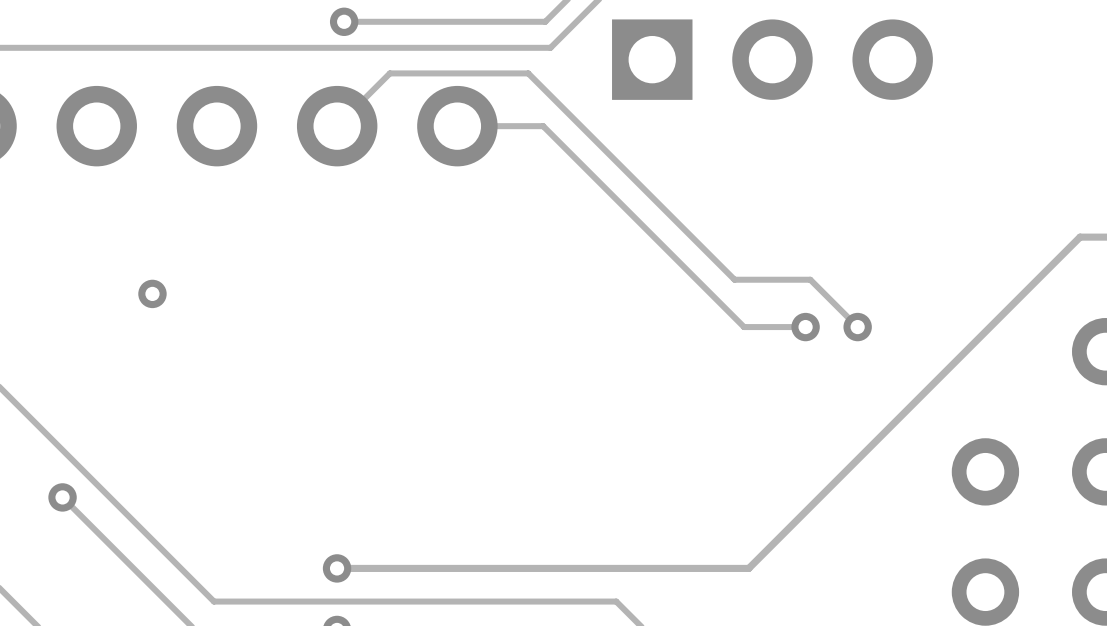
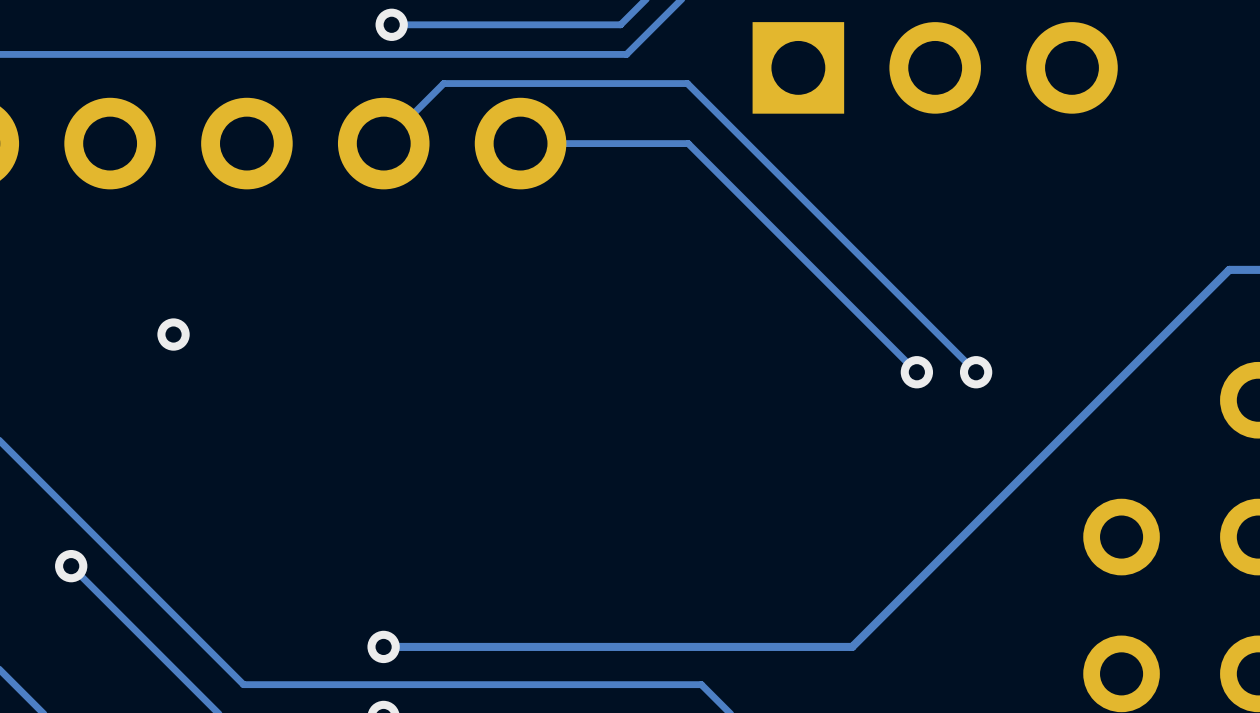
part position: (772, 59) -> (935, 67)
track: (528, 73) (734, 279) (810, 279) -> (601, 83) (687, 83) (922, 318)
track: (543, 126) (744, 327) (805, 327) -> (618, 143) (688, 143) (916, 372)

